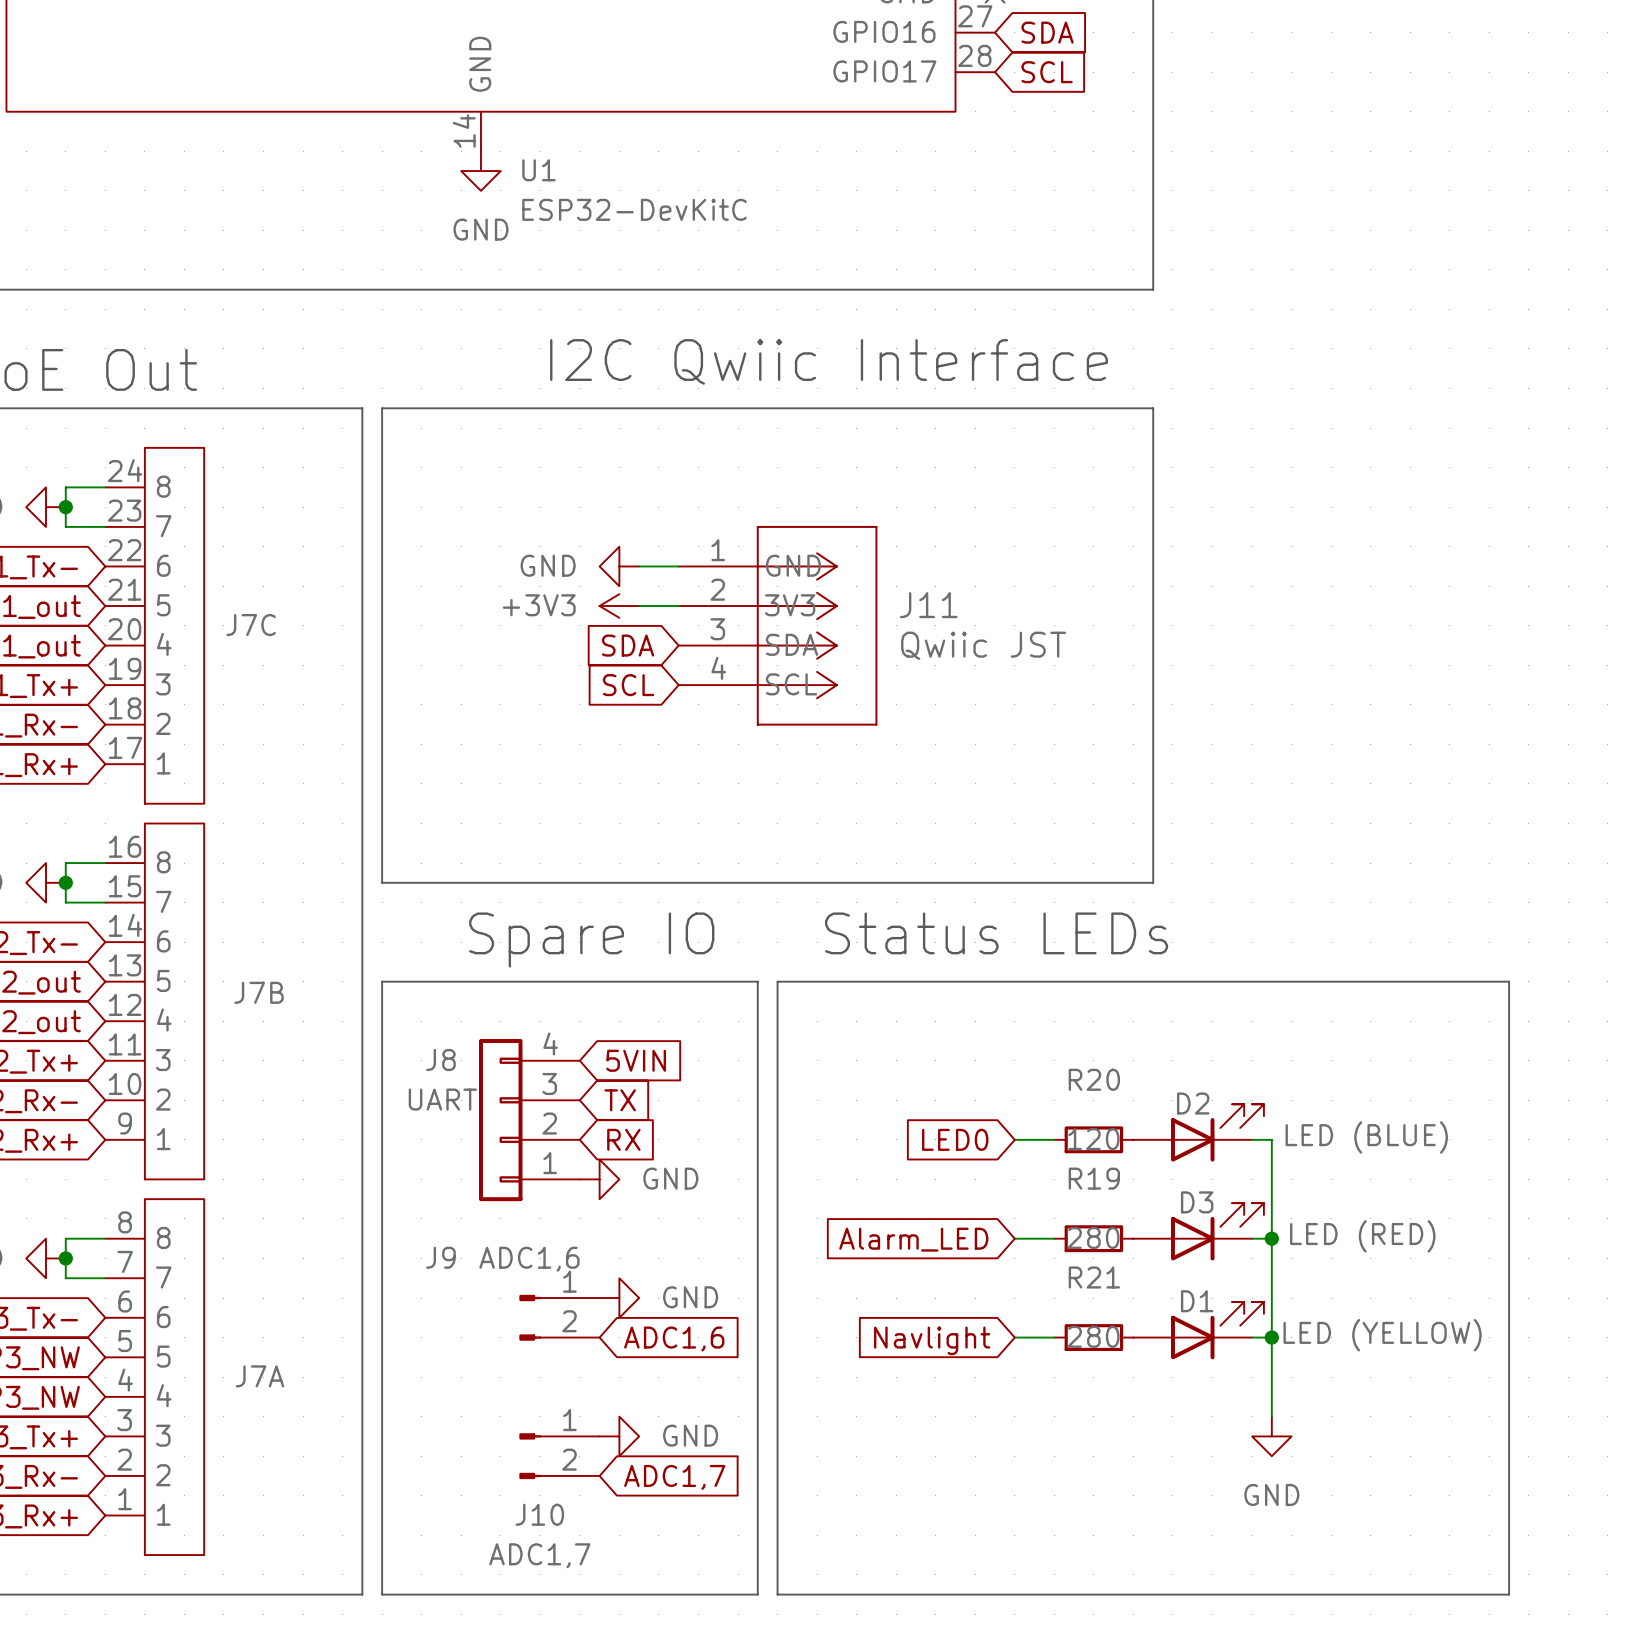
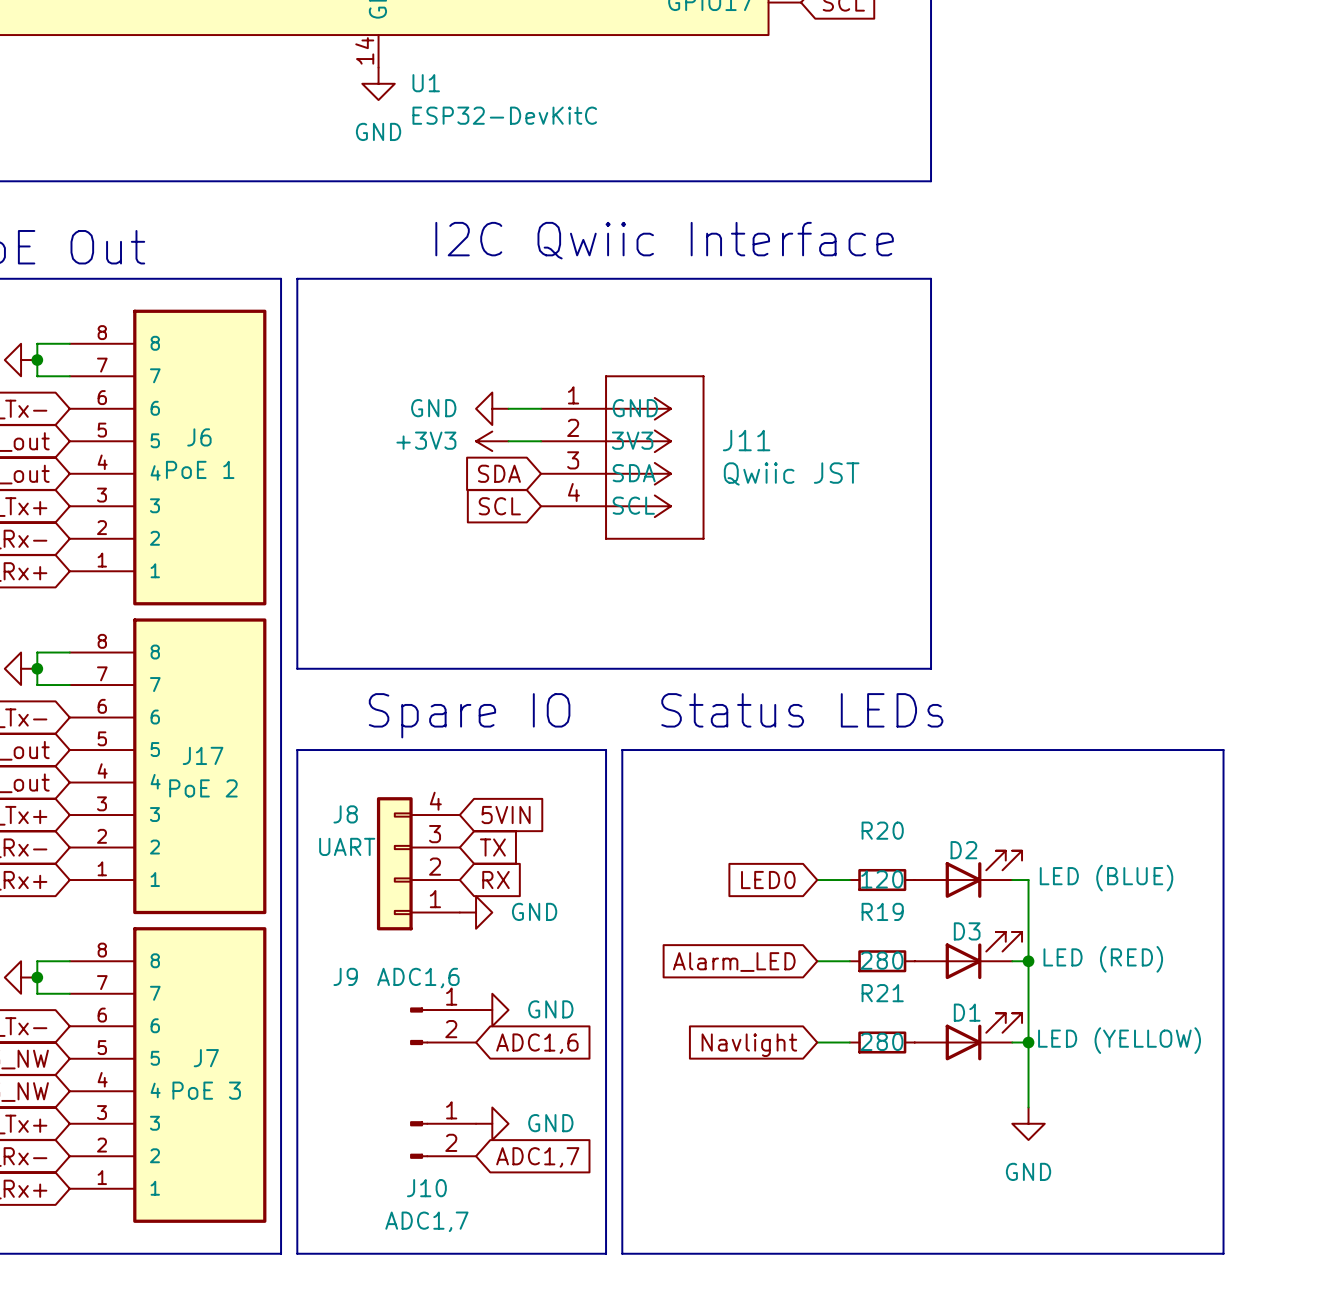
J7C: (154, 625) -> none
J6: none -> PoE 1 (168, 457)
J7B: (154, 1001) -> none
J17: none -> PoE 2 (168, 766)
J7A: (154, 1377) -> none
J7: none -> PoE 3 (168, 1075)

